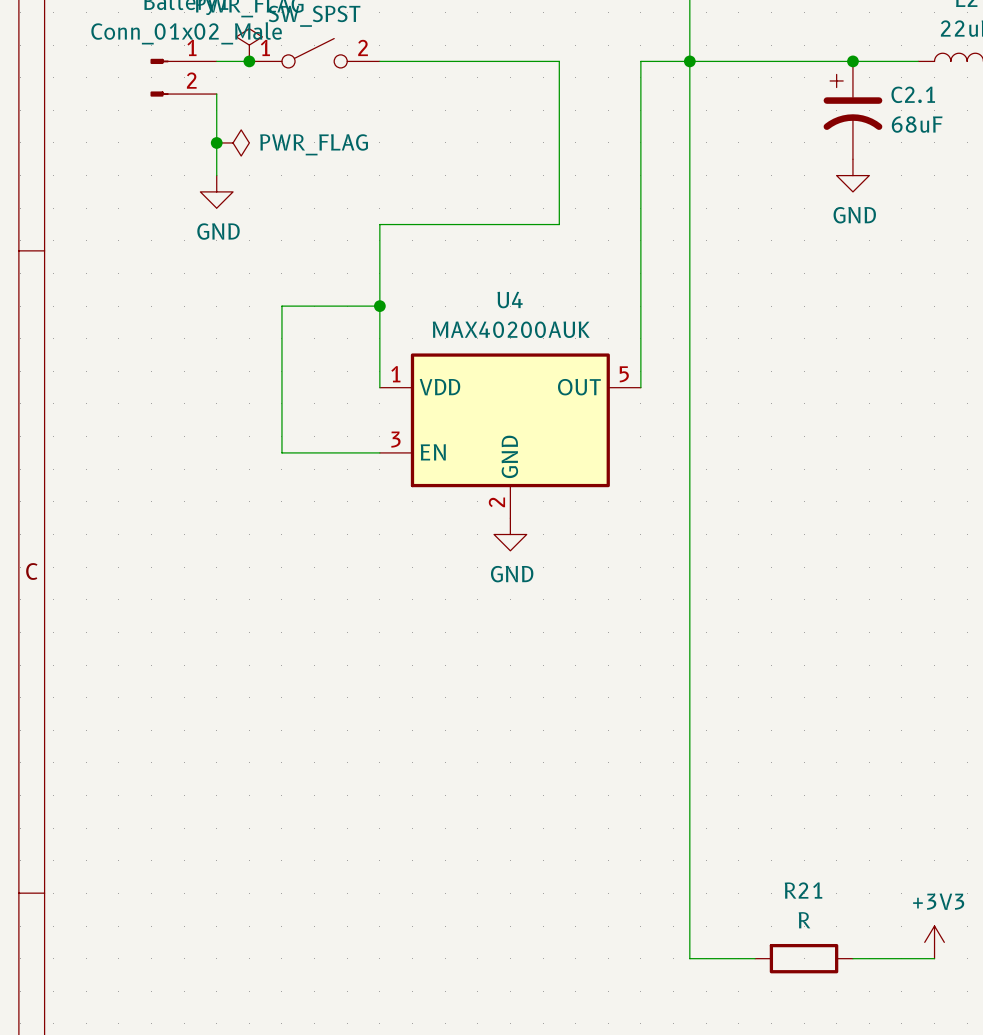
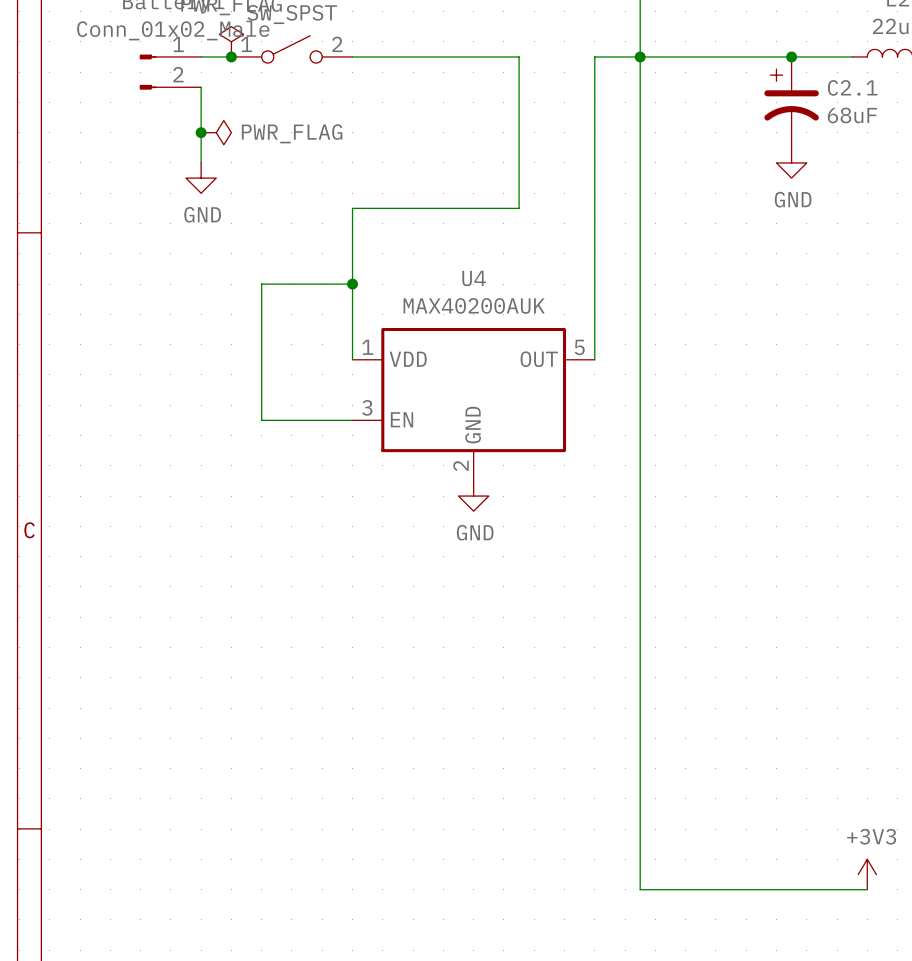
wire: none -> (700, 889) (791, 889)
R21: R (804, 958) -> none

